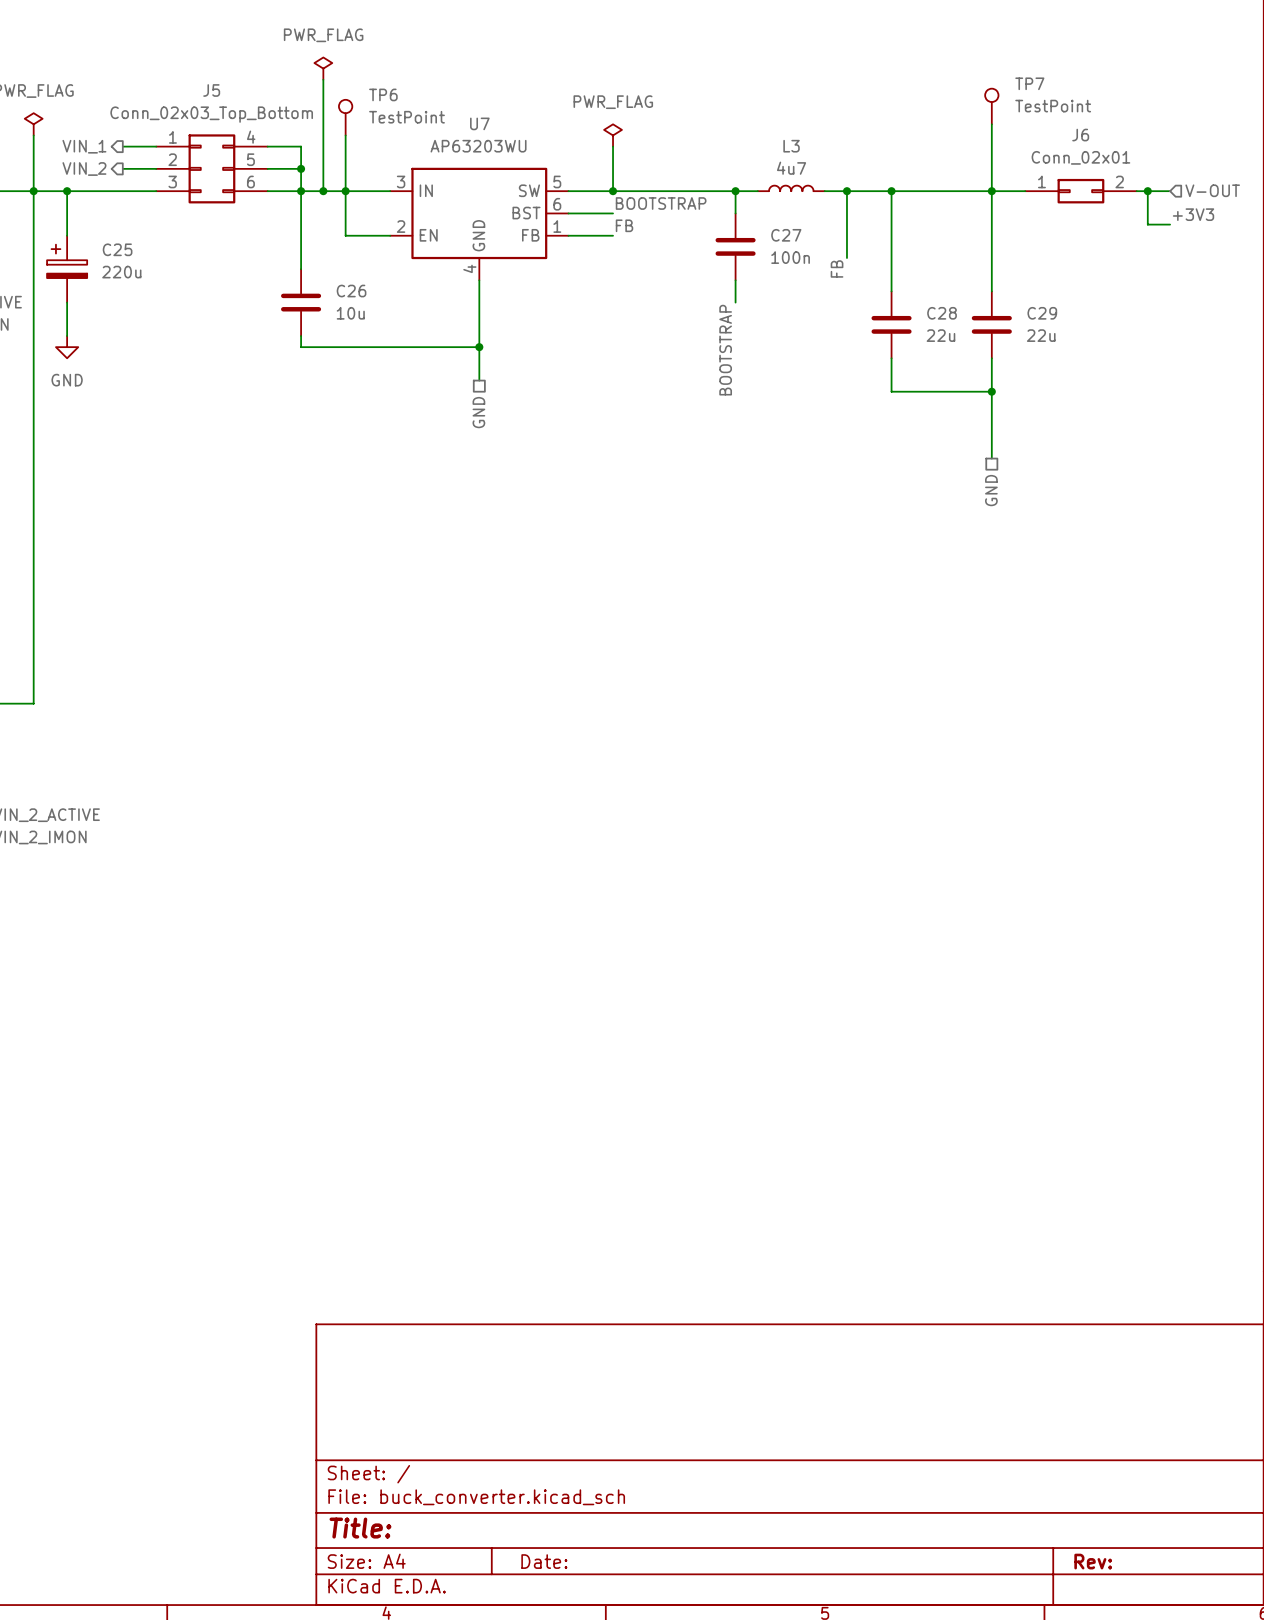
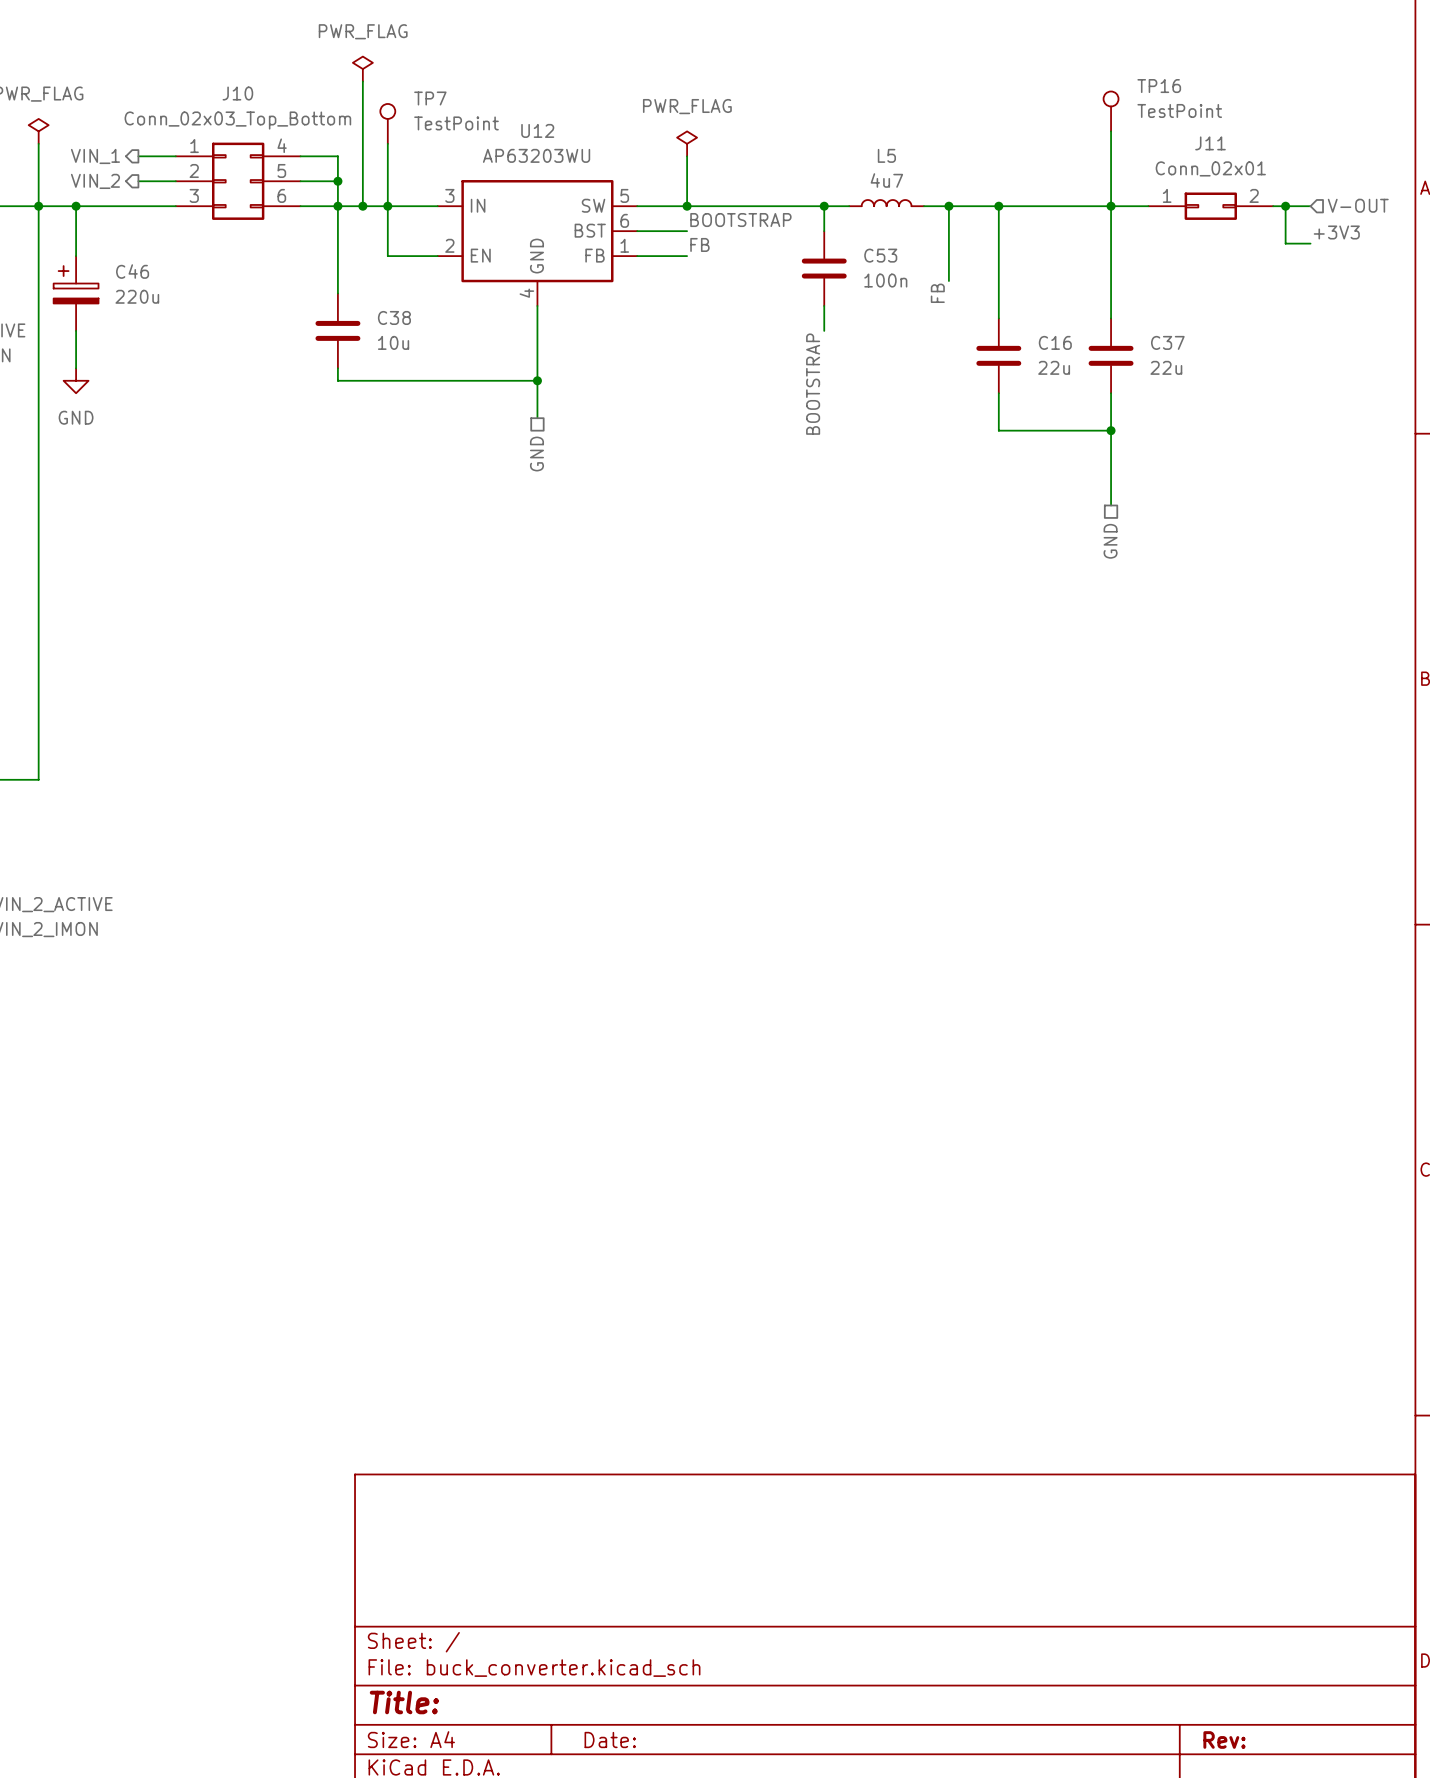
TP7 name: TP7 (1029, 83) -> TP16 (1159, 86)
J5 name: J5 (211, 90) -> J10 (237, 93)
TP6 name: TP6 (383, 94) -> TP7 (430, 98)
U7 name: U7 (479, 123) -> U12 (537, 130)
J6 name: J6 (1080, 135) -> J11 (1210, 143)
L3 name: L3 (791, 146) -> L5 (886, 155)
C27 name: C27 (786, 235) -> C53 (880, 255)
C25 name: C25 (117, 249) -> C46 (132, 271)
C26 name: C26 (351, 291) -> C38 (394, 317)
C28 name: C28 (942, 313) -> C16 (1055, 342)
C29 name: C29 (1042, 313) -> C37 (1167, 342)

